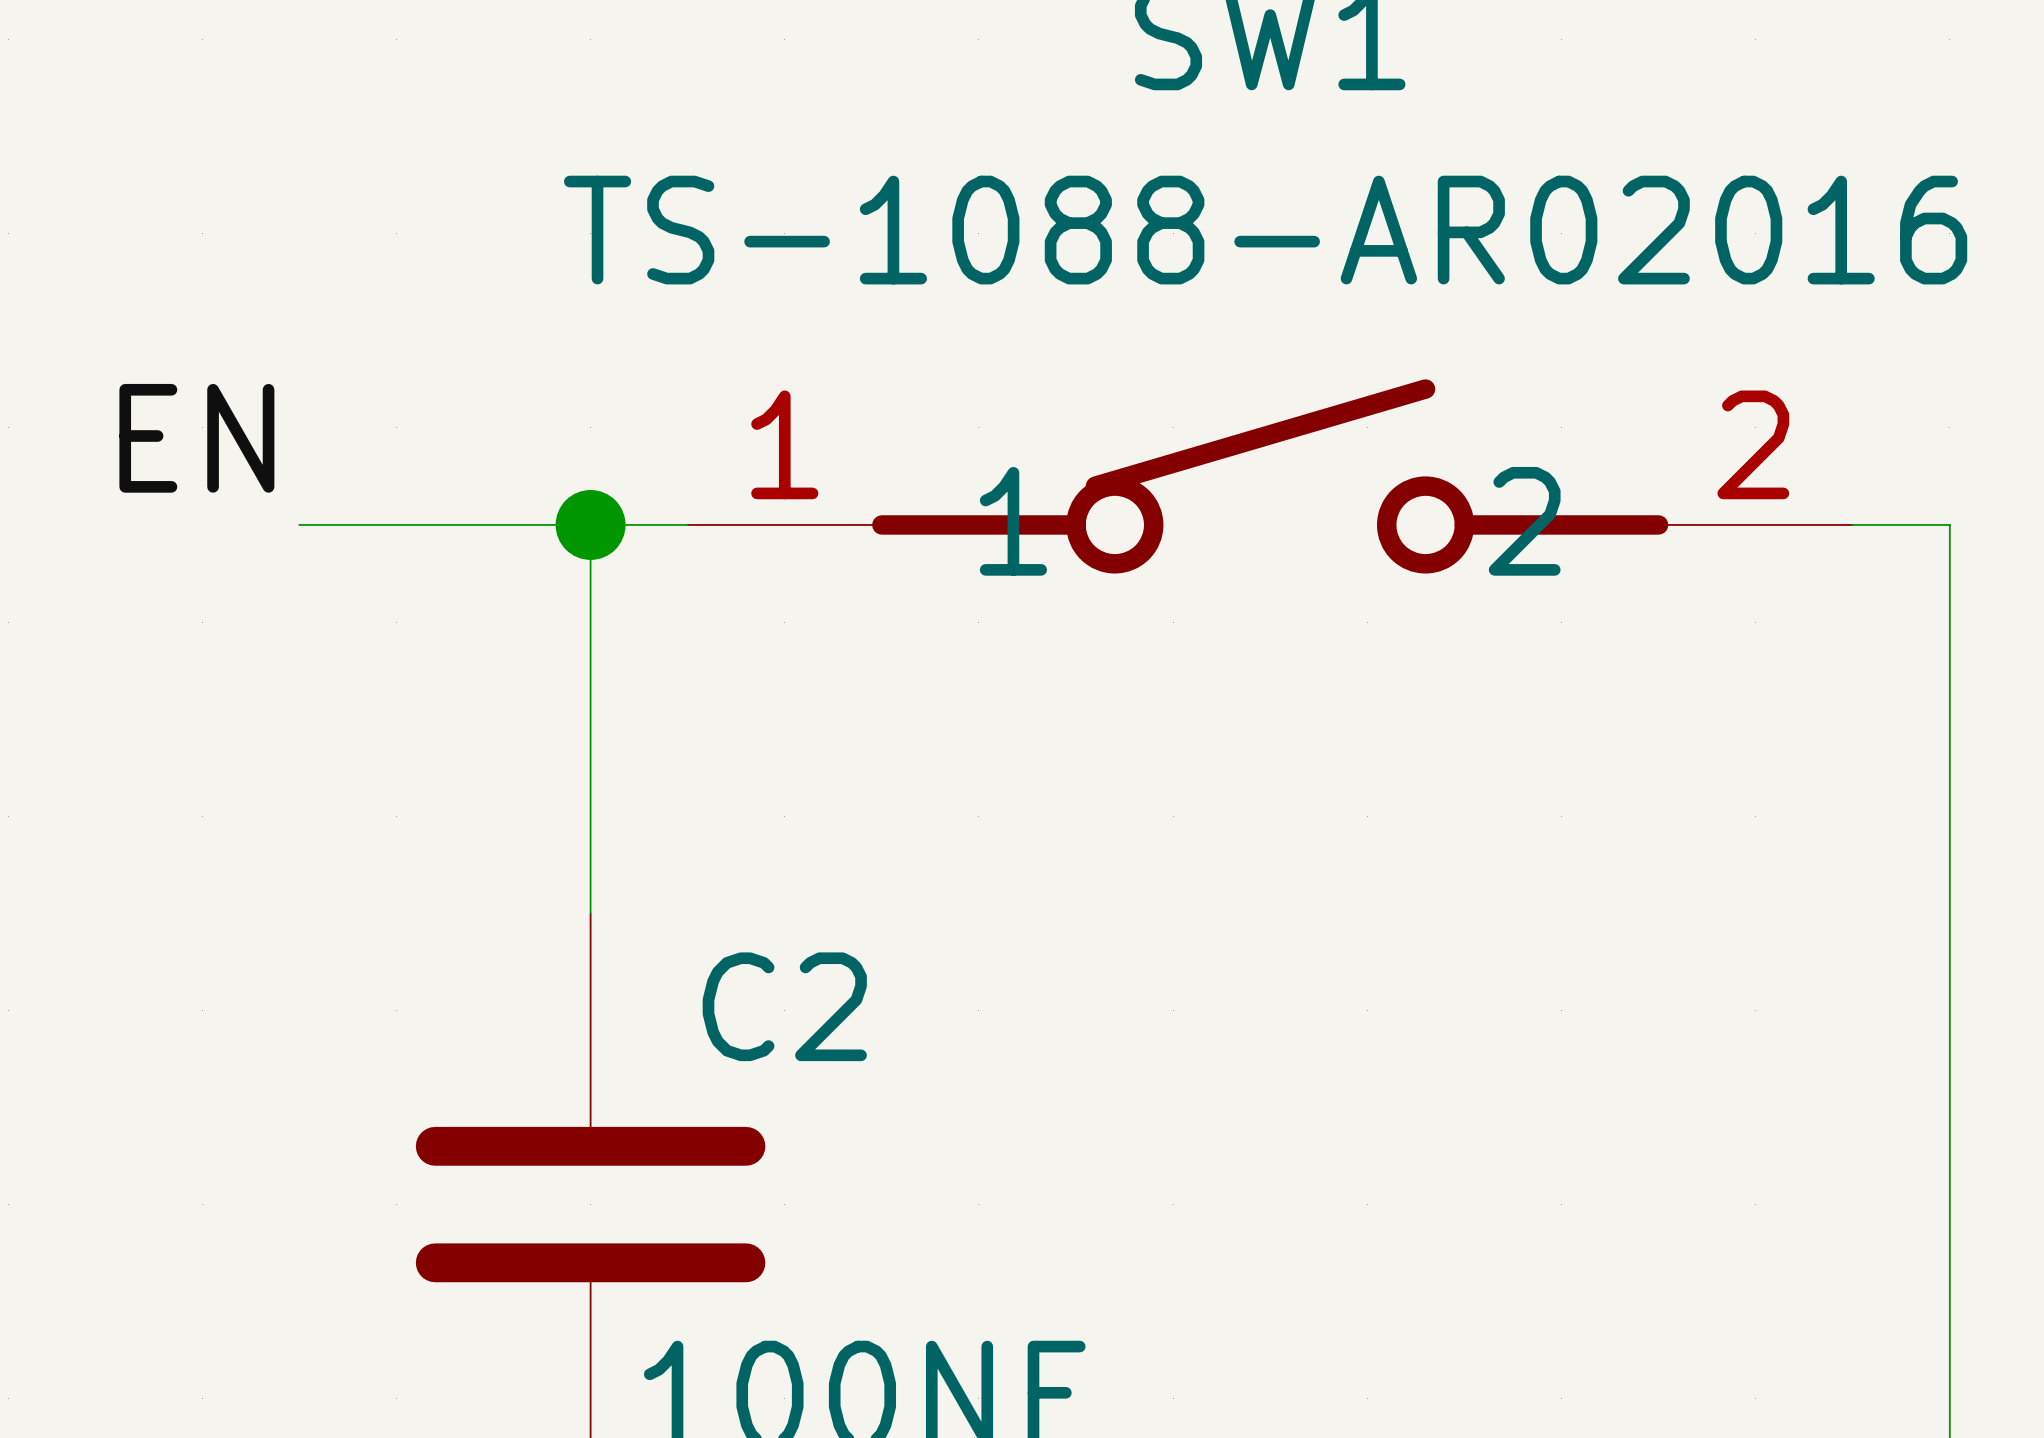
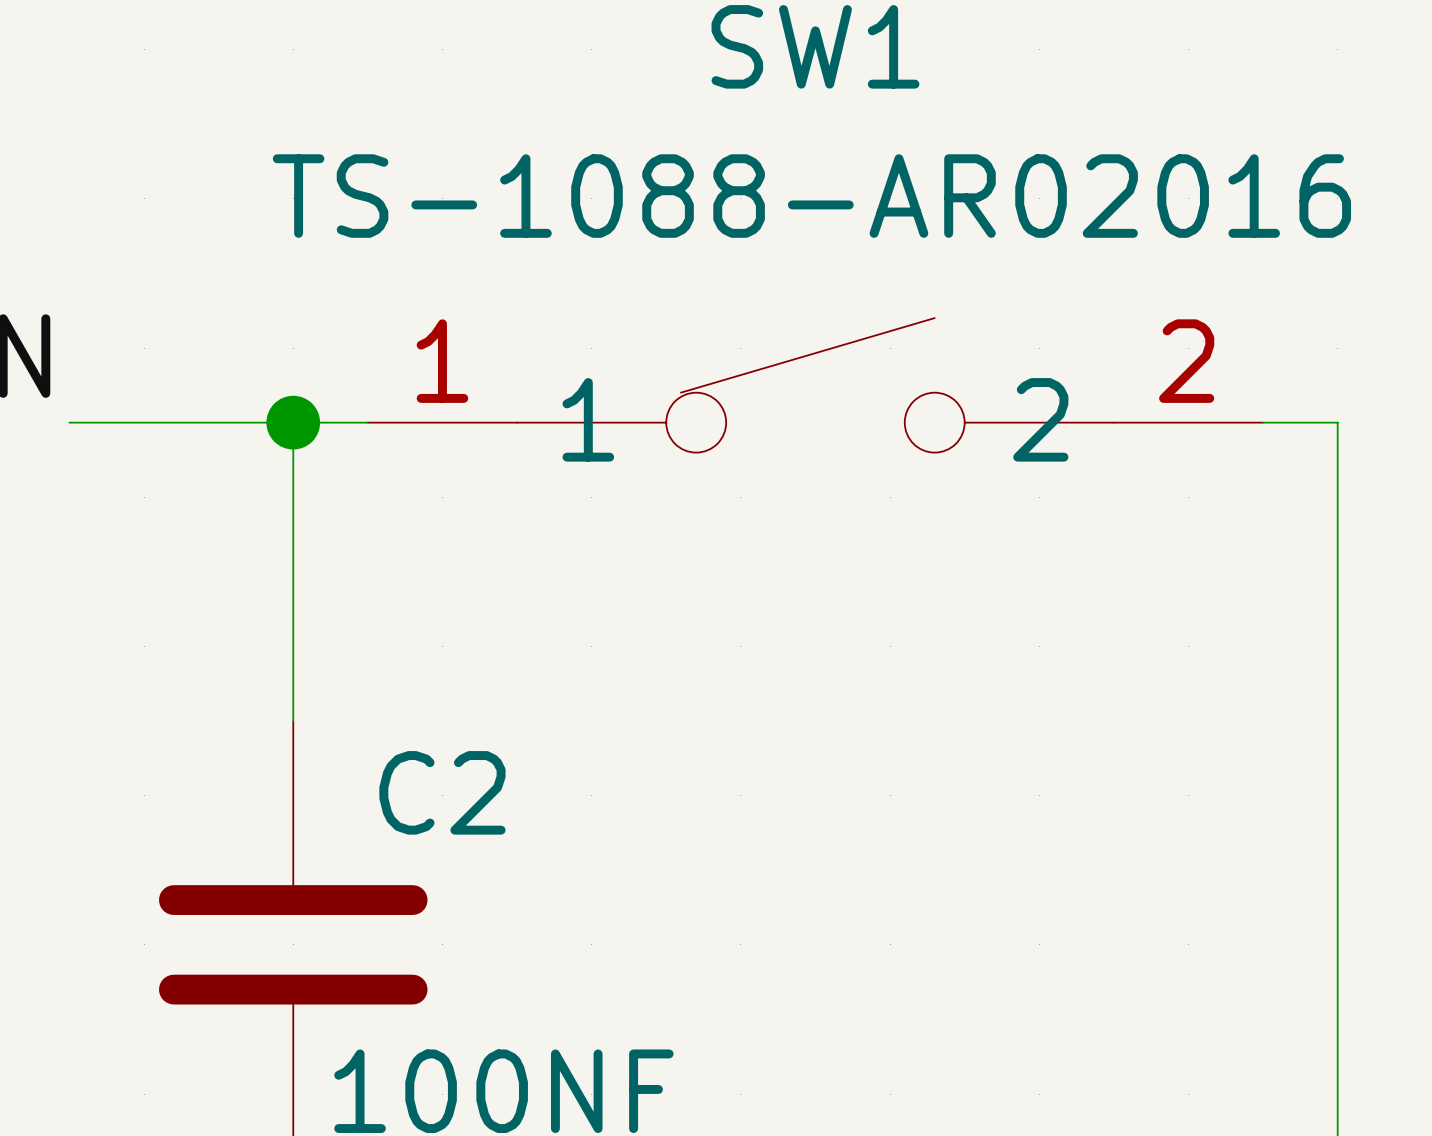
SW1 symbol: [687, 379, 1853, 574] -> [367, 318, 1264, 453]

